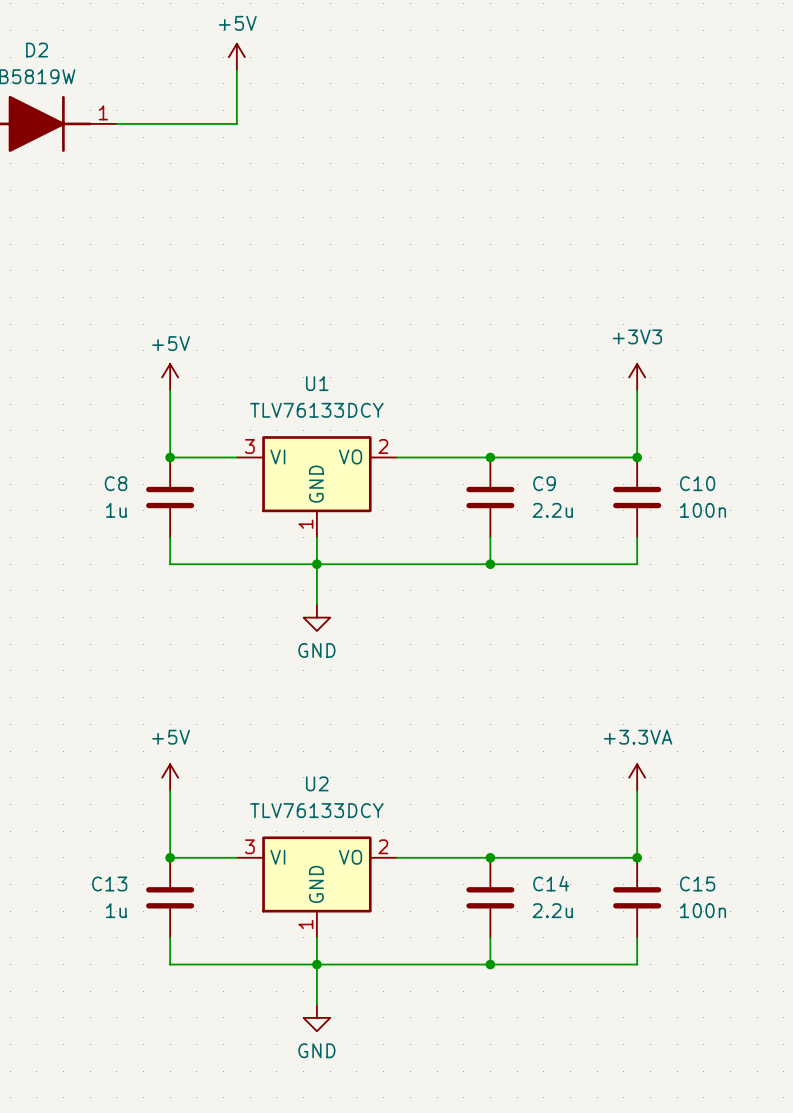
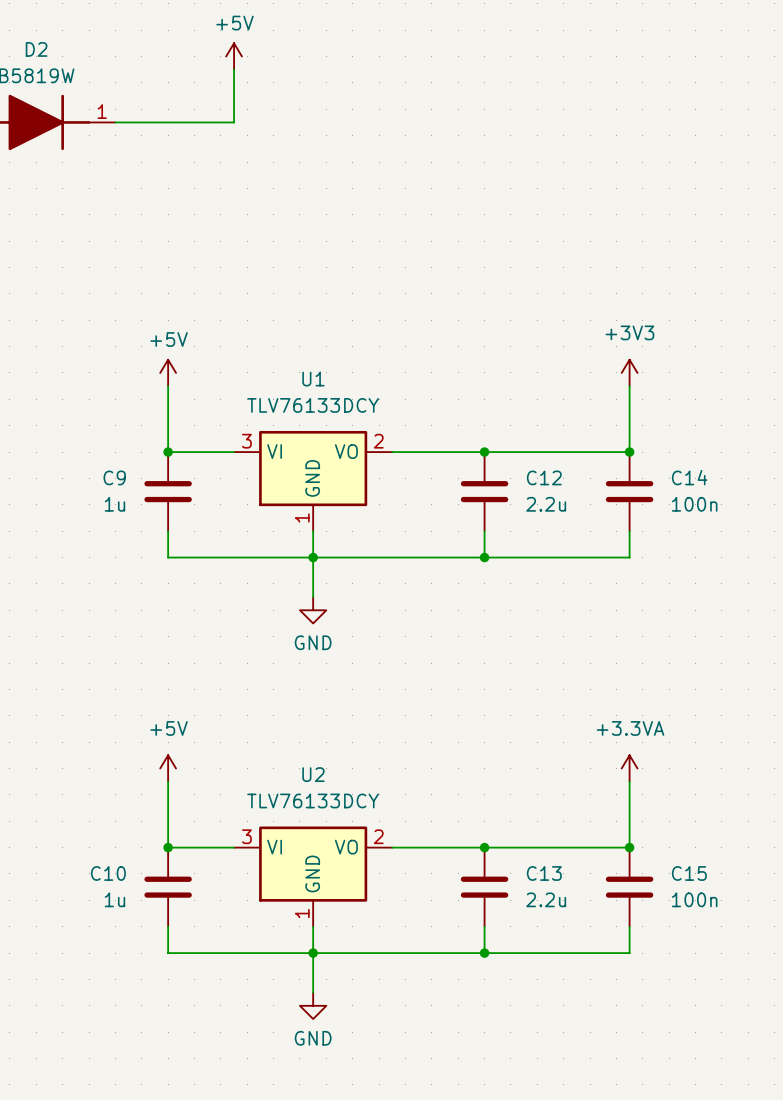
C8 name: C8 (116, 483) -> C9 (114, 477)
C9 name: C9 (544, 483) -> C12 (544, 477)
C10 name: C10 (697, 483) -> C14 (689, 477)
C13 name: C13 (109, 883) -> C10 (108, 873)
C14 name: C14 (551, 883) -> C13 (544, 873)

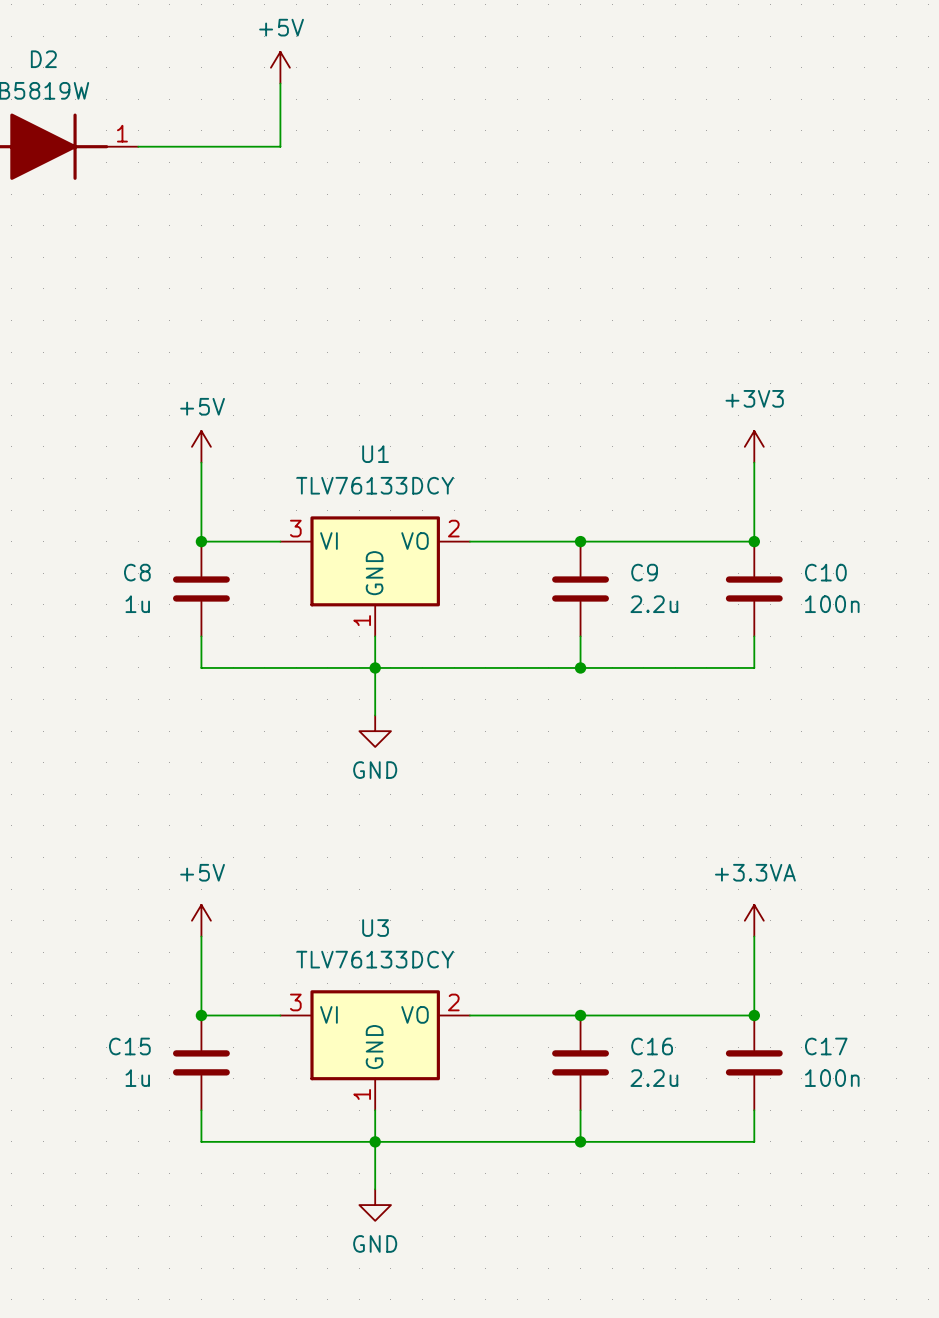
C9 name: C9 (114, 477) -> C8 (137, 572)
C12 name: C12 (544, 477) -> C9 (644, 572)
C14 name: C14 (689, 477) -> C10 (825, 572)
U2 name: U2 (313, 774) -> U3 (375, 928)
C10 name: C10 (108, 873) -> C15 (129, 1046)
C13 name: C13 (544, 873) -> C16 (652, 1046)
C15 name: C15 (689, 873) -> C17 (826, 1046)

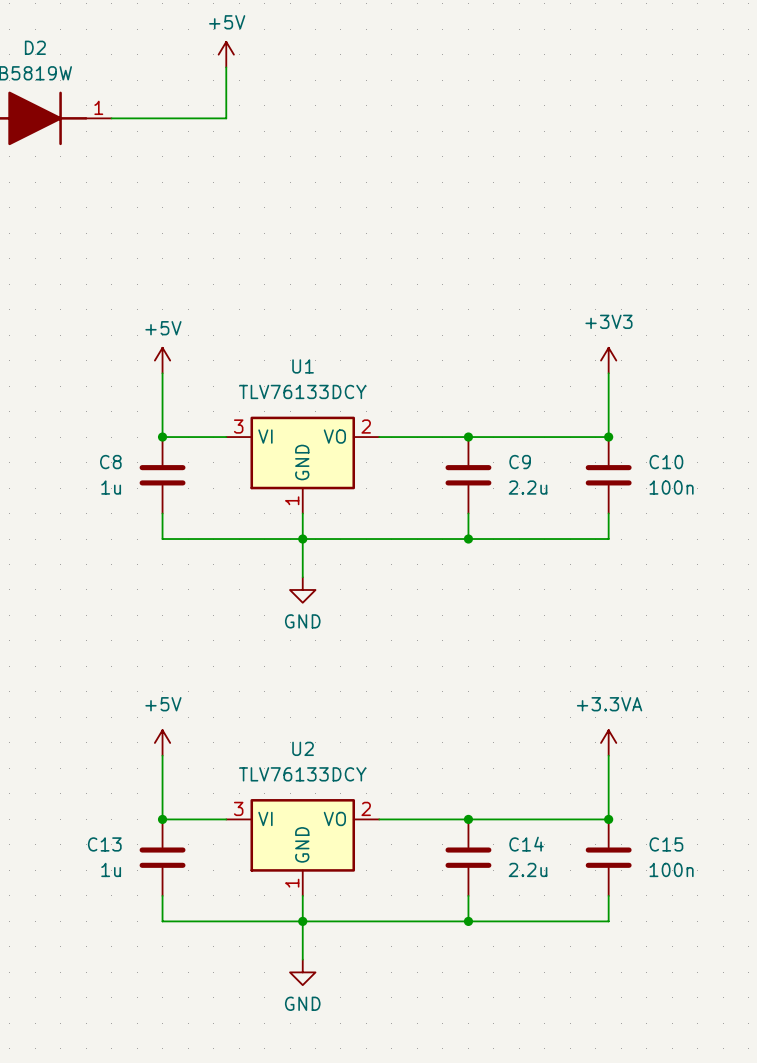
U3 name: U3 (375, 928) -> U2 (303, 748)
C15 name: C15 (129, 1046) -> C13 (104, 844)
C16 name: C16 (652, 1046) -> C14 (526, 844)
C17 name: C17 (826, 1046) -> C15 (666, 844)

